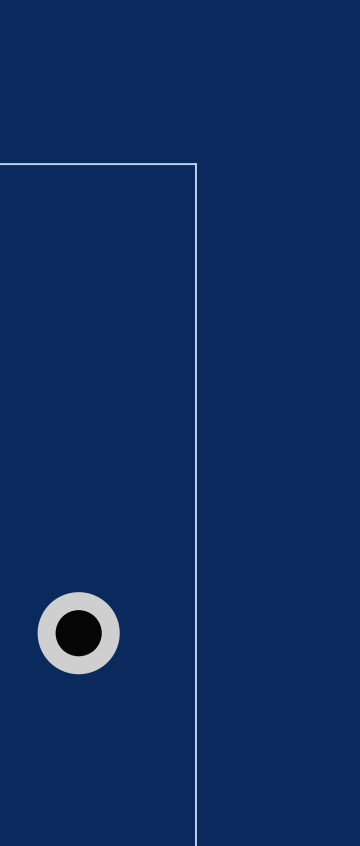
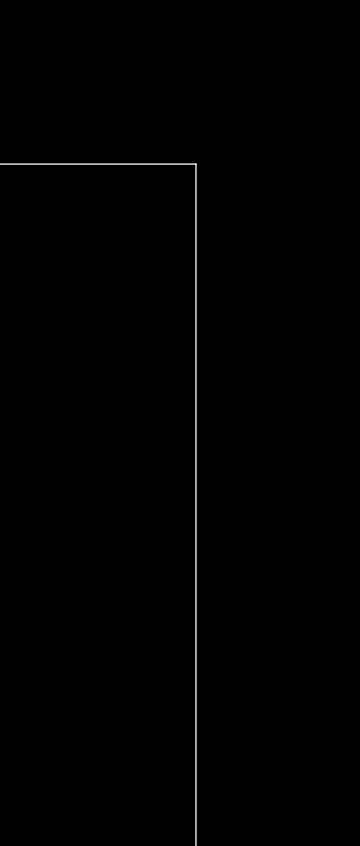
part: (78, 633) -> none

